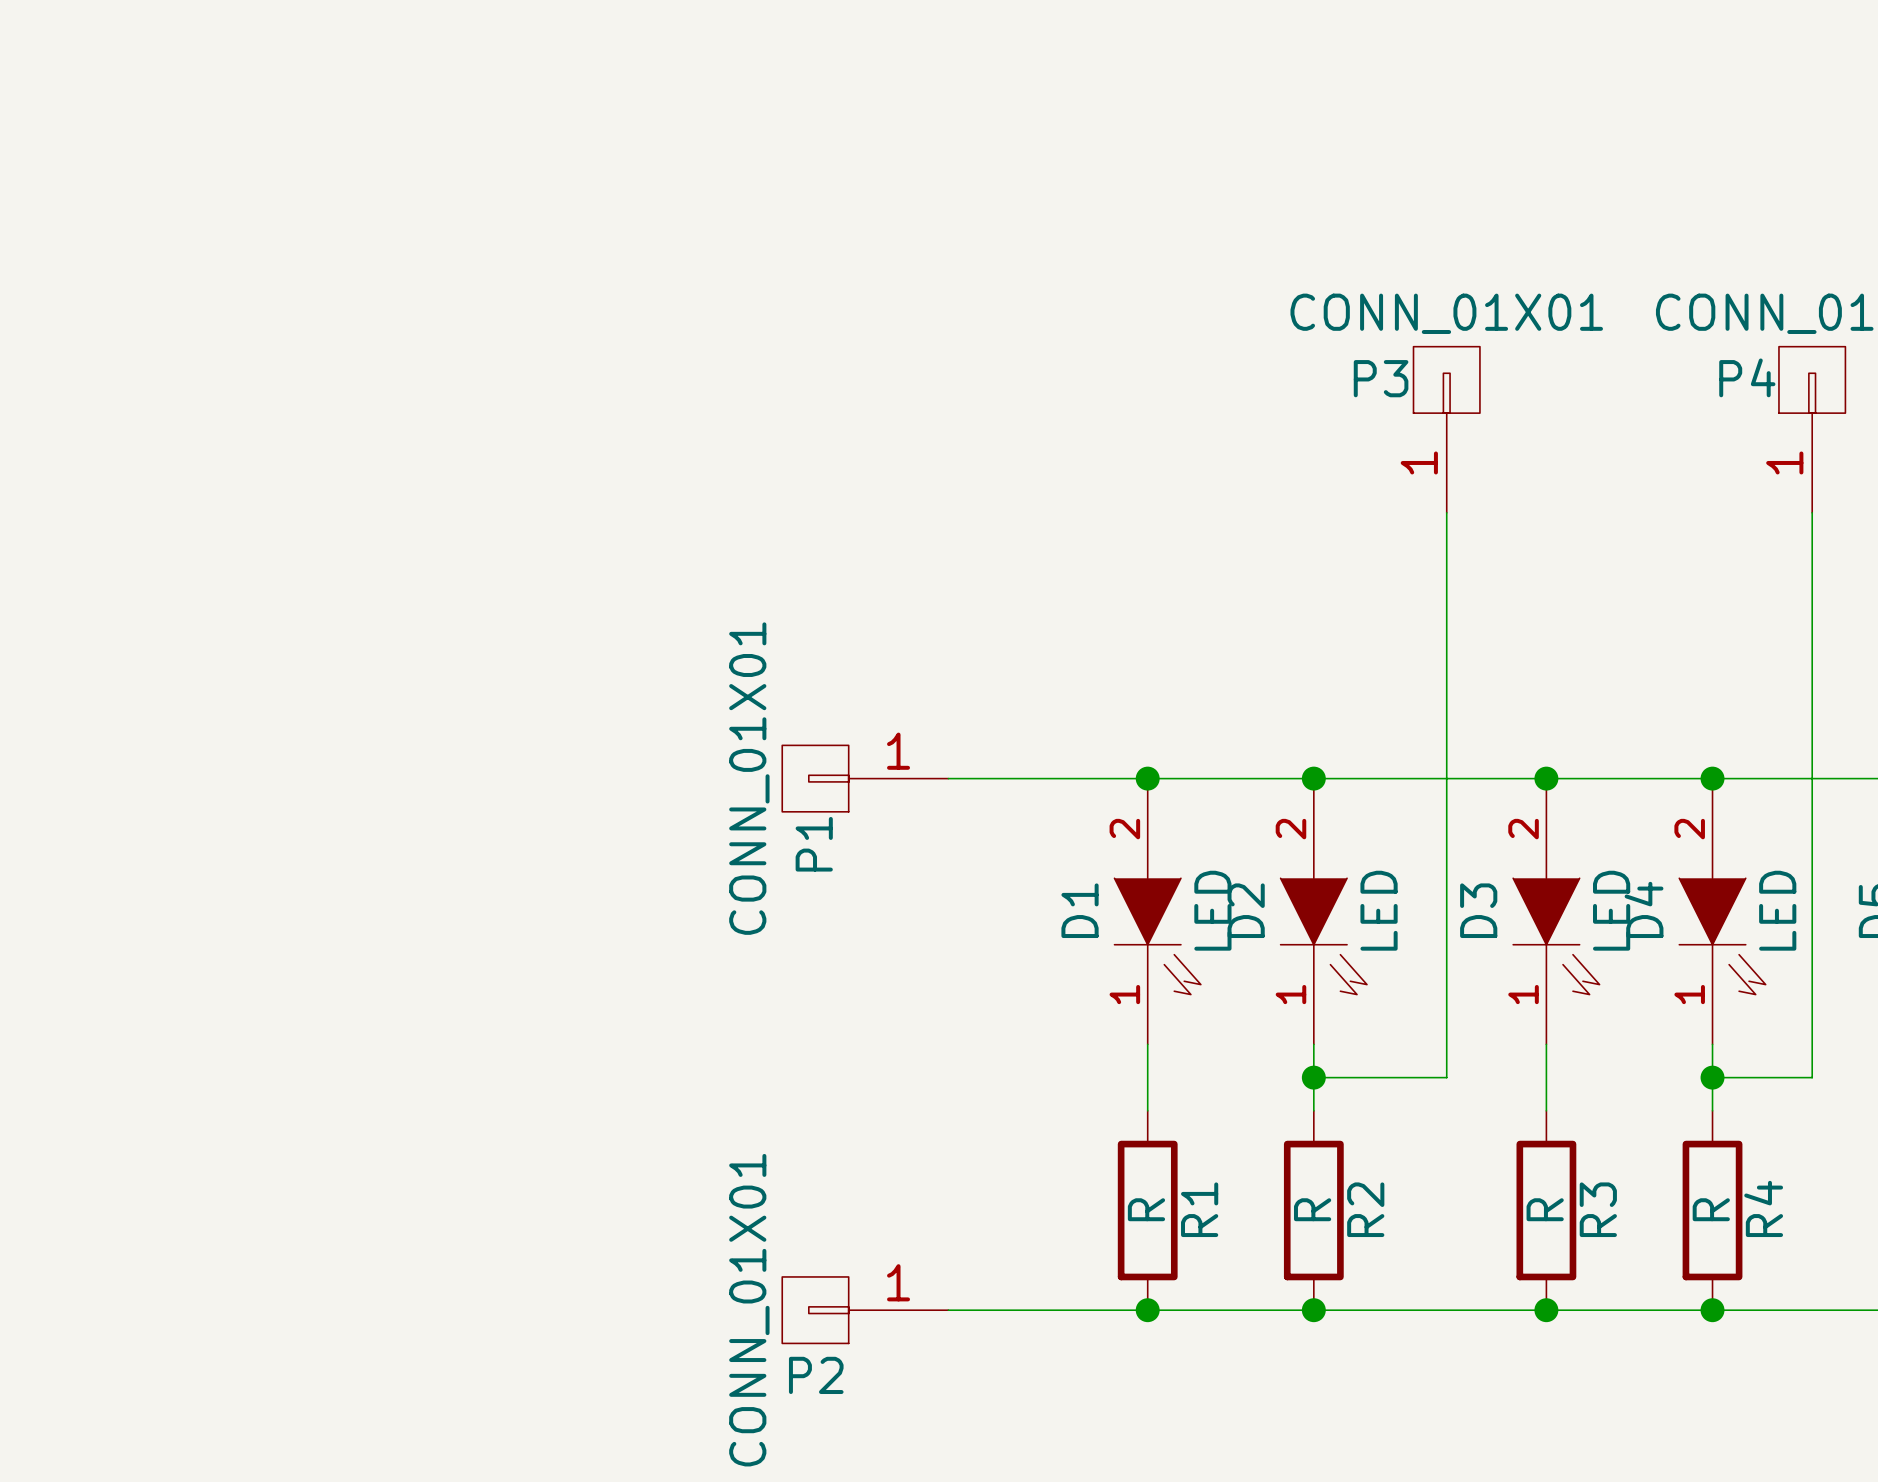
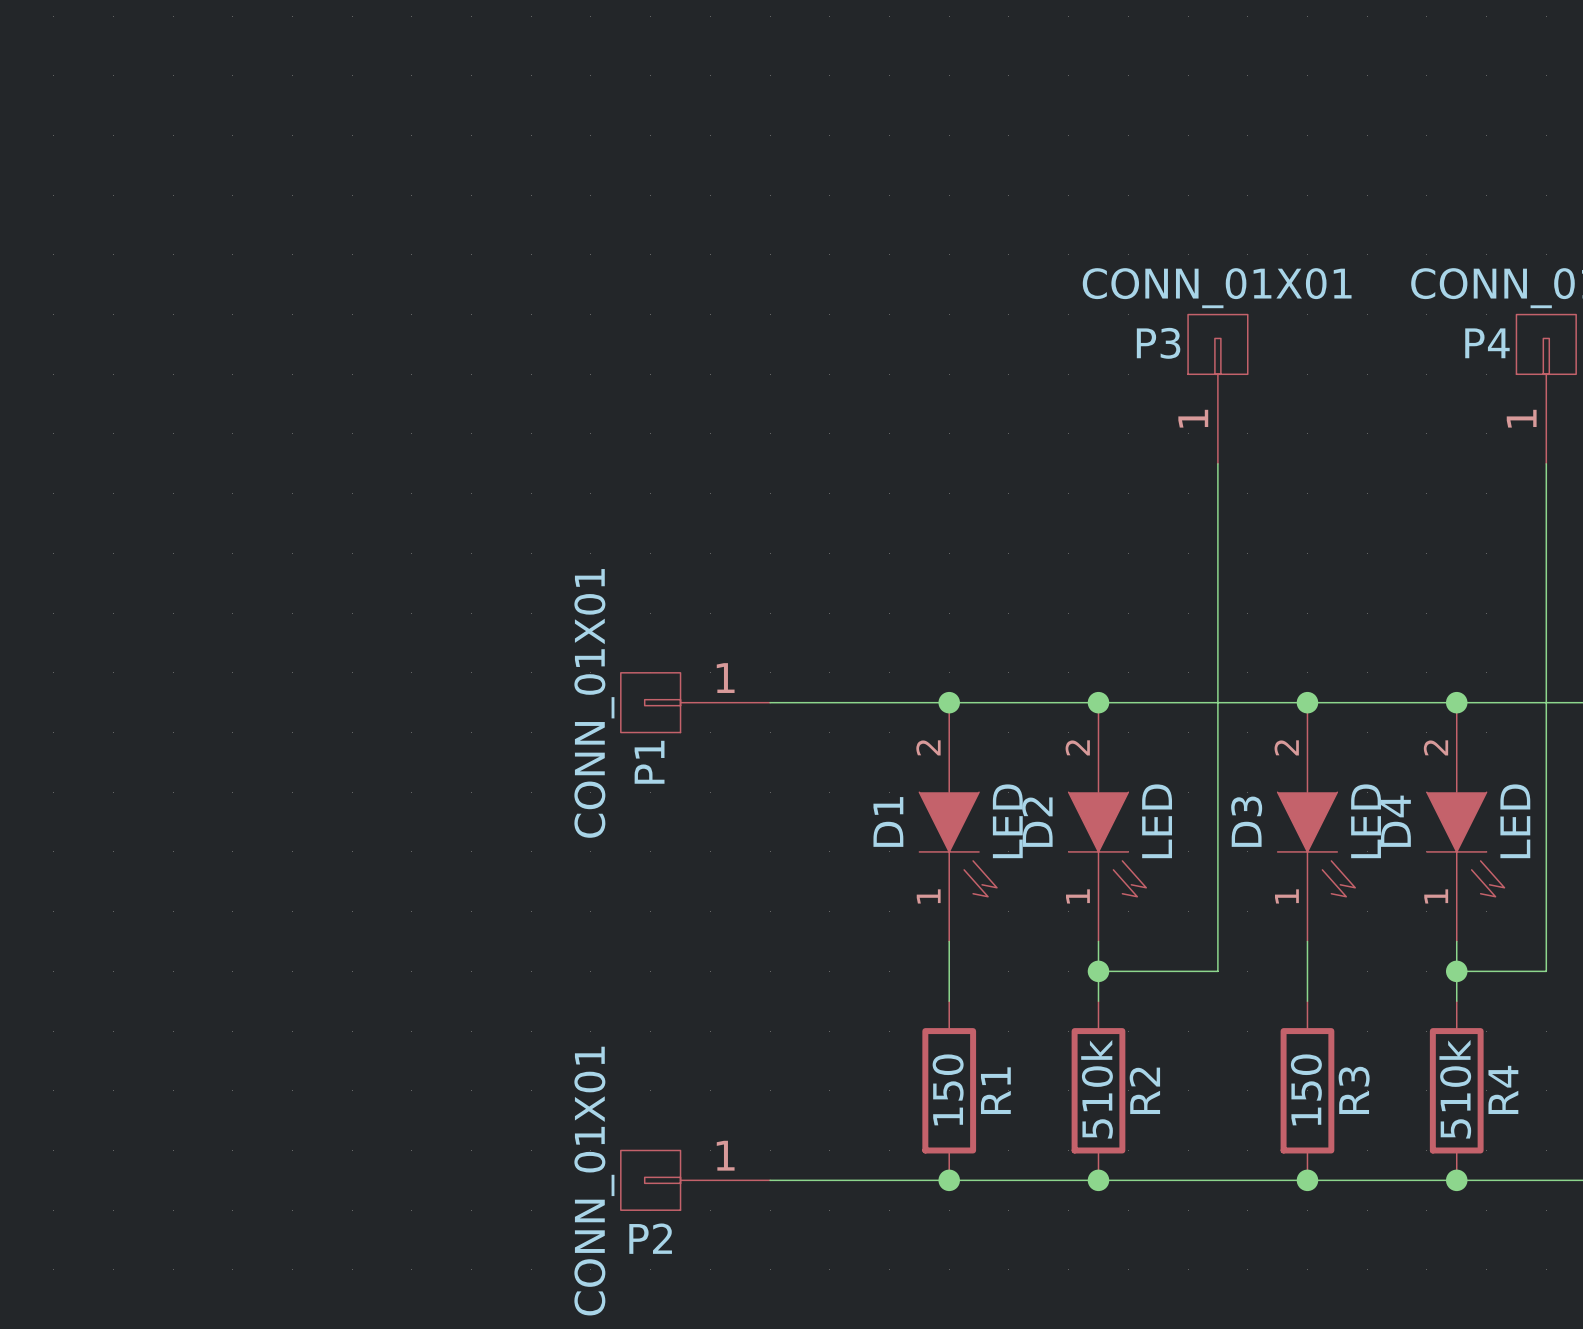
R1 value: R (1146, 1209) -> 150 (948, 1089)
R2 value: R (1312, 1209) -> 510k (1097, 1089)
R3 value: R (1545, 1209) -> 150 (1306, 1089)
R4 value: R (1711, 1209) -> 510k (1455, 1089)

